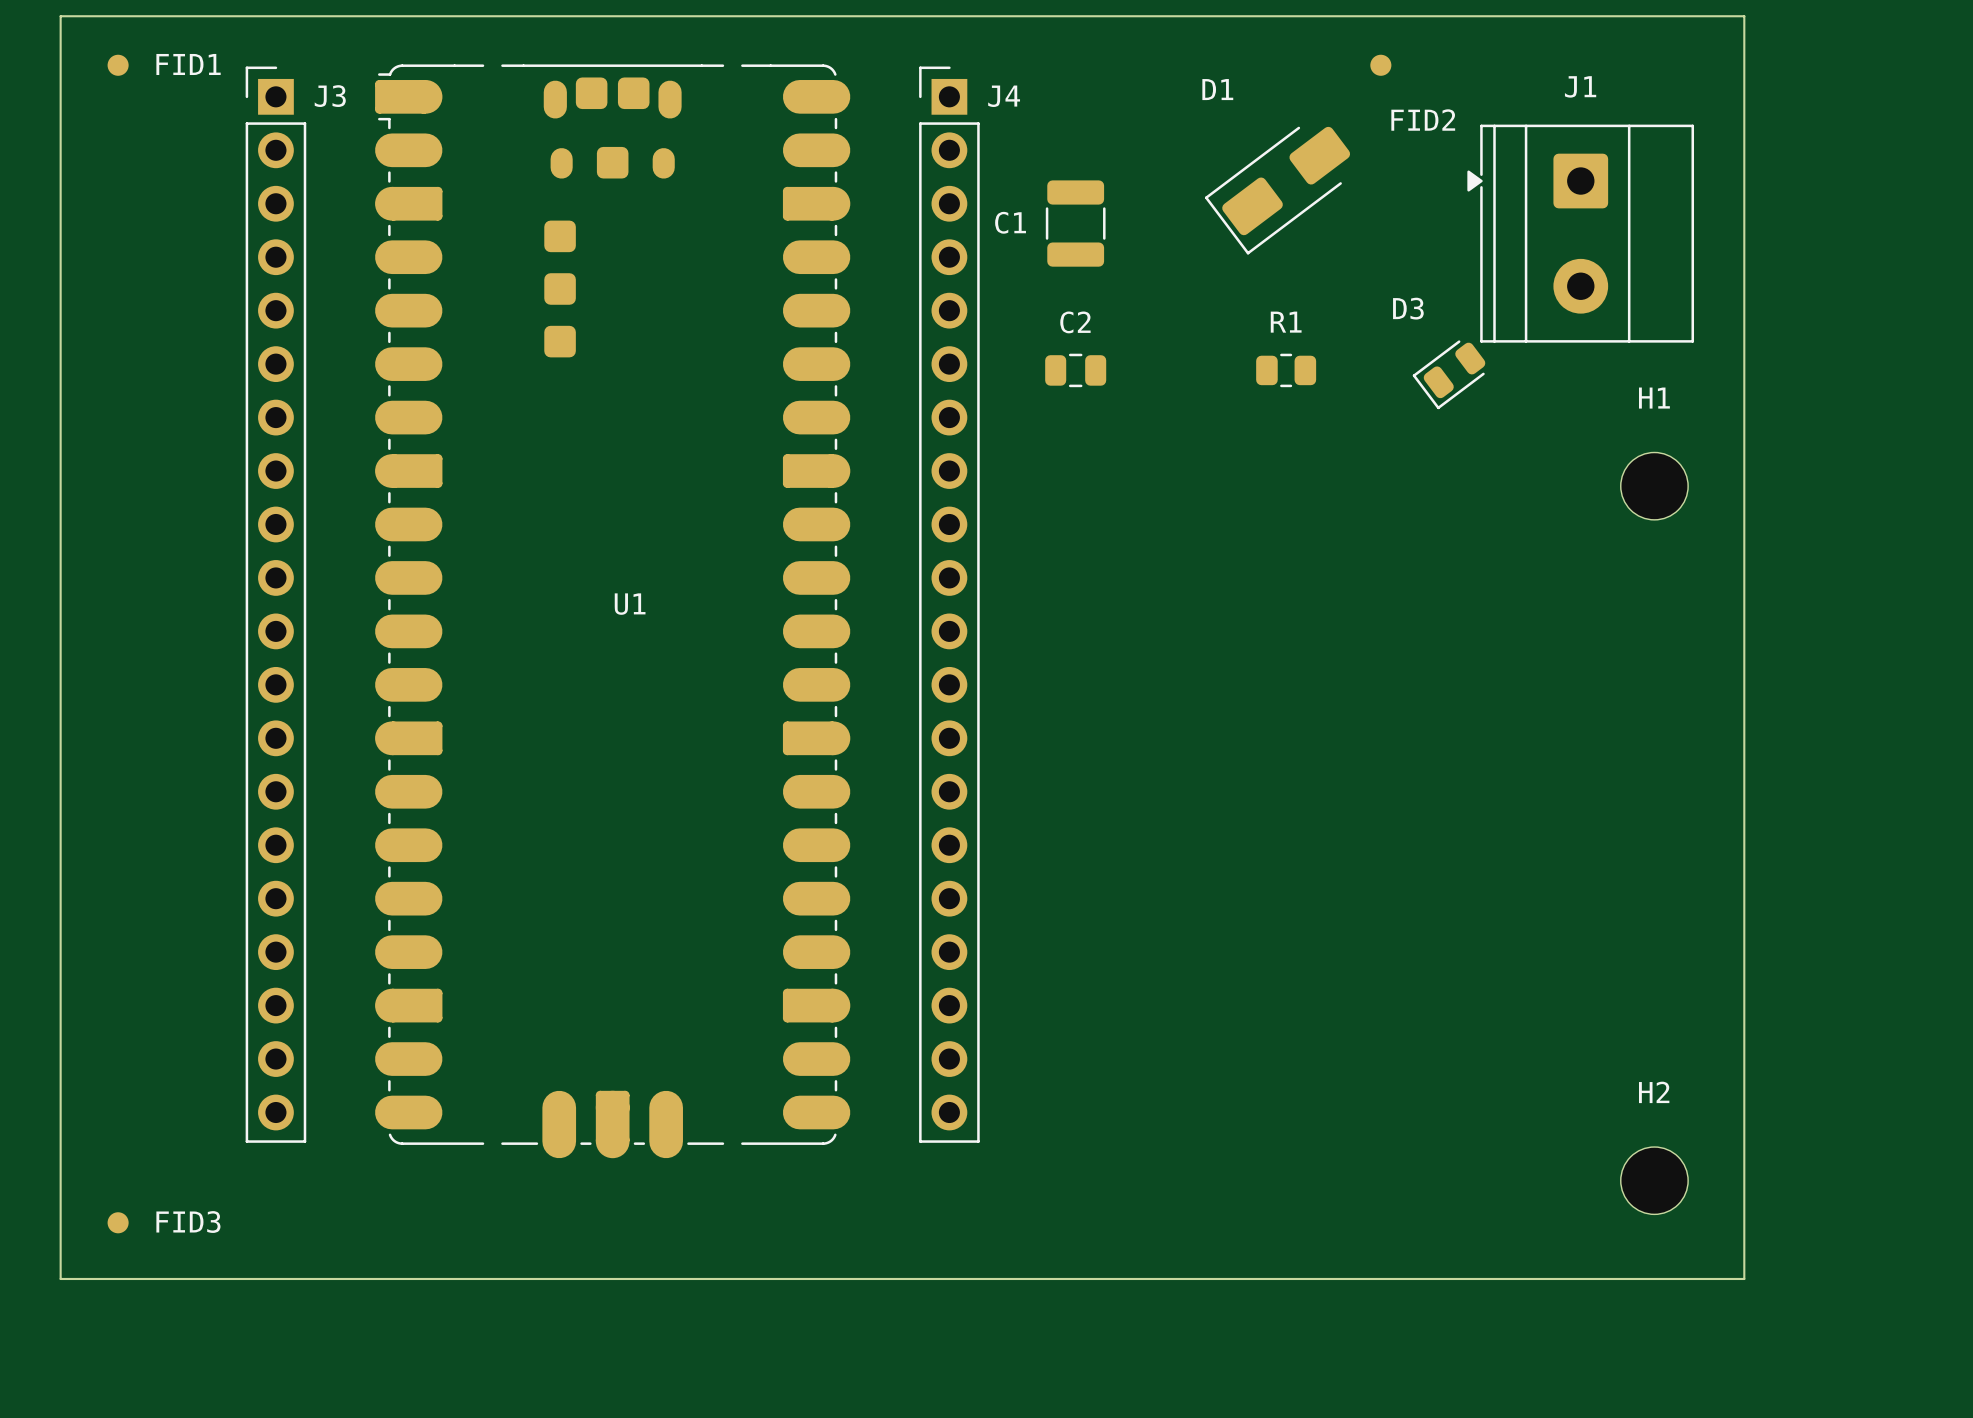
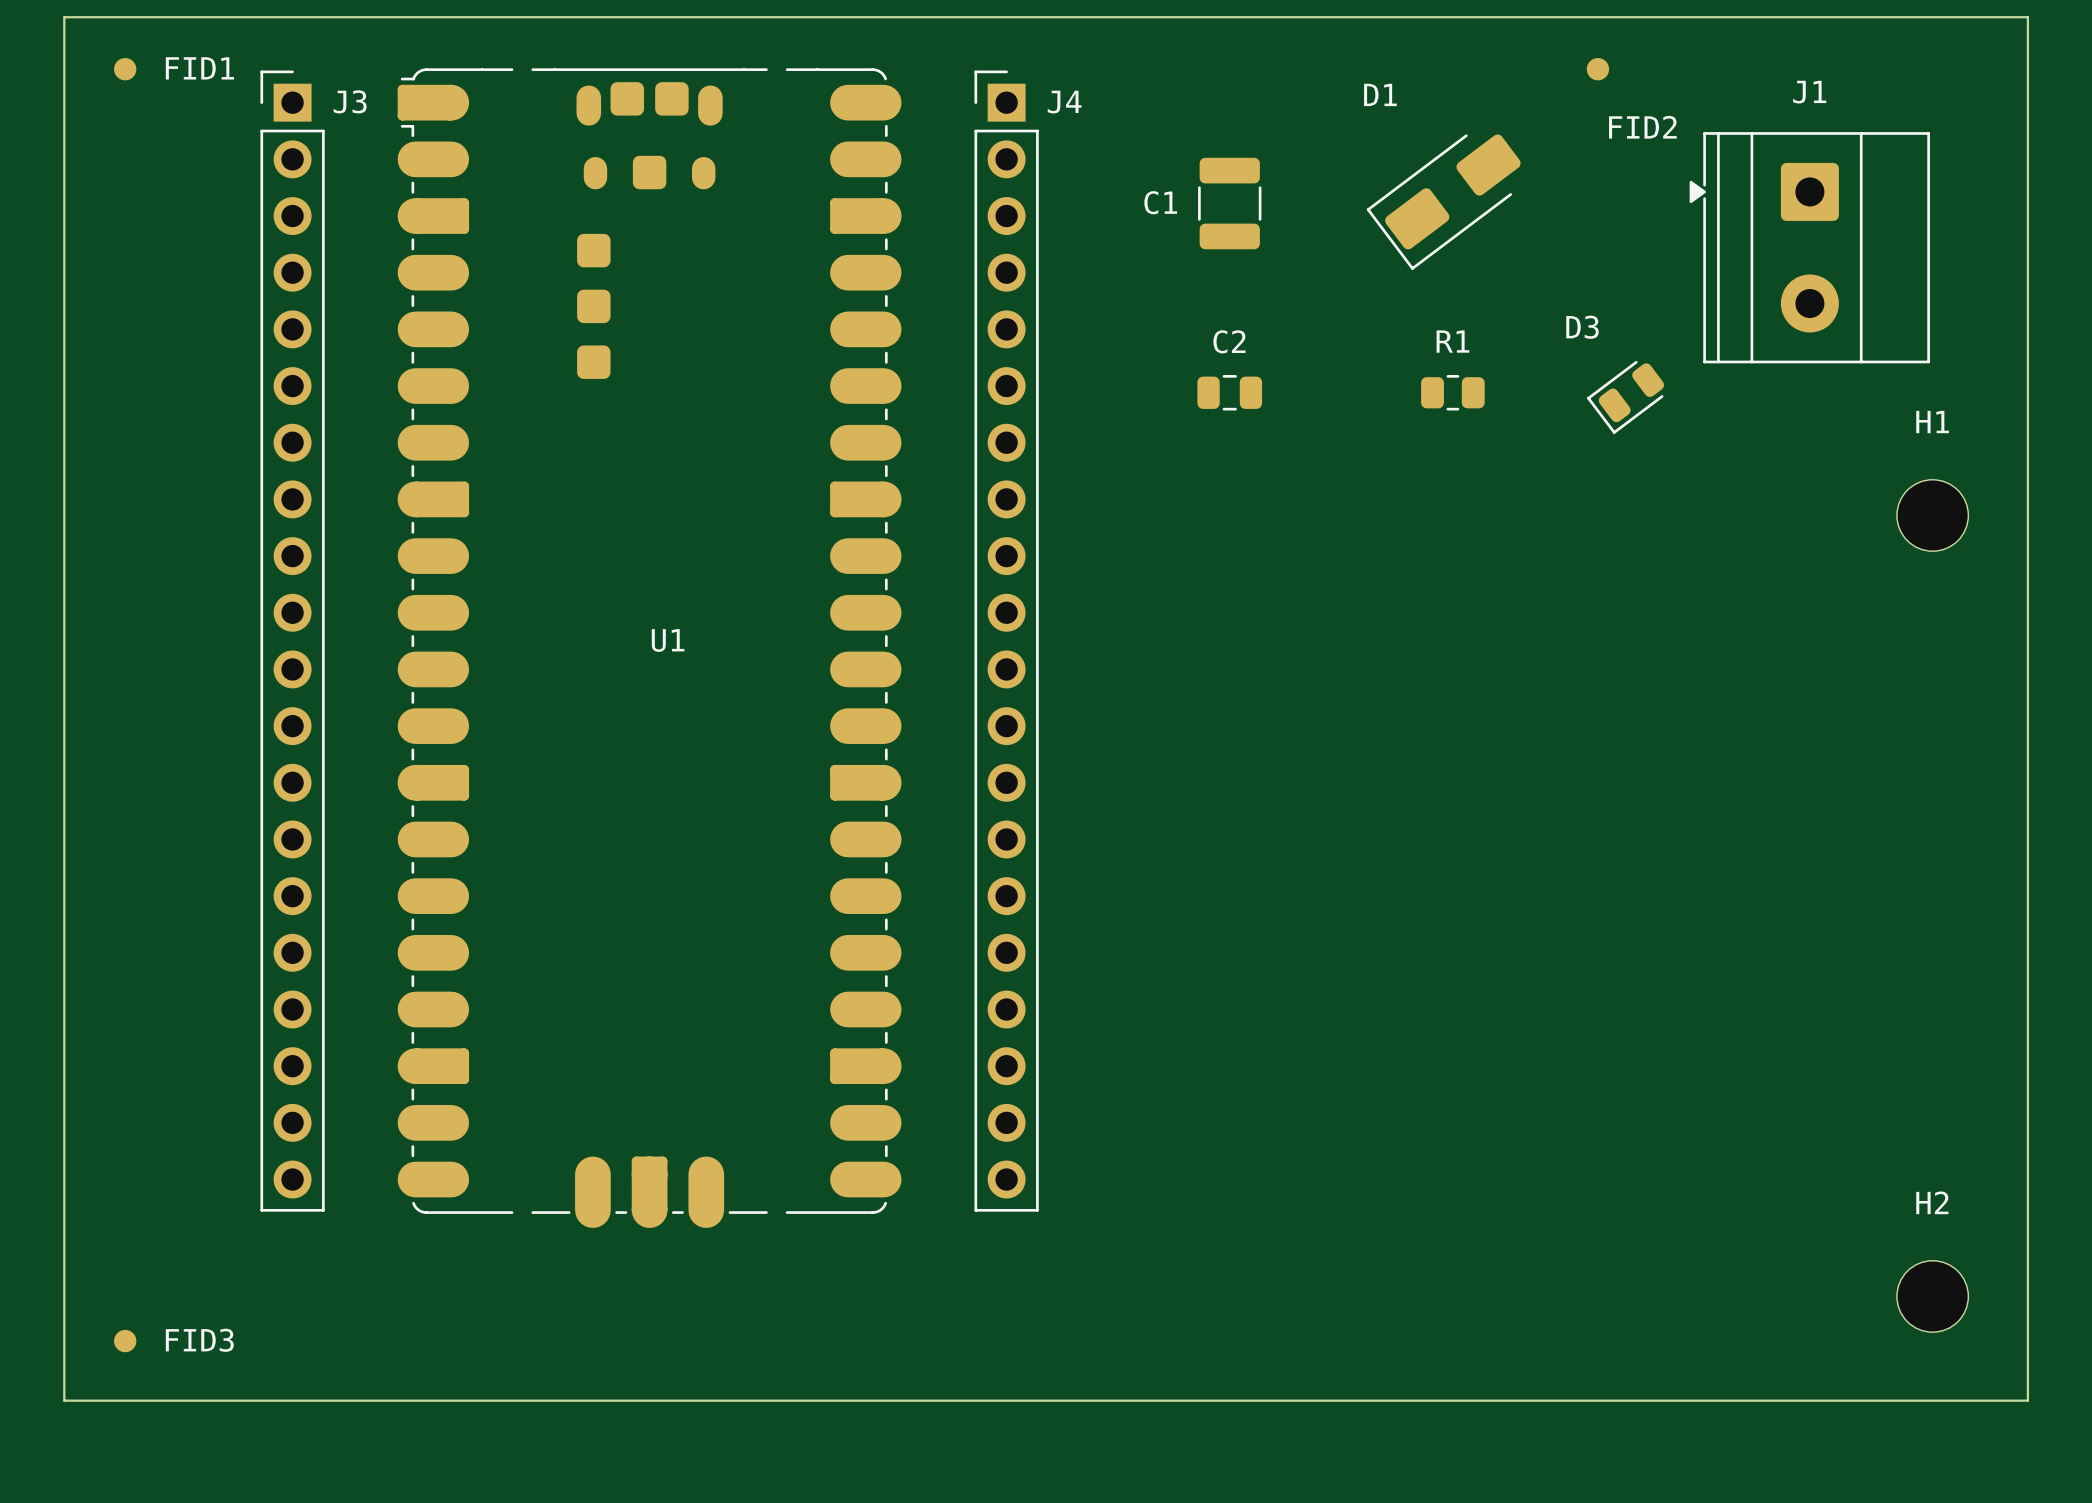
board edge: (1744, 16) (1744, 1278) (60, 1278) -> (1849, 17) (2027, 17) (2027, 1400) (64, 1400) (64, 1356)
FID2 position: (1380, 65) -> (1597, 69)
D1 position: (1277, 190) -> (1443, 202)
C1 position: (1075, 223) -> (1229, 203)
J1 position: (1580, 233) -> (1809, 247)
C2 position: (1075, 370) -> (1229, 392)
R1 position: (1286, 370) -> (1452, 392)
D3 position: (1449, 374) -> (1625, 397)
H1 position: (1654, 486) -> (1932, 515)
H2 position: (1654, 1180) -> (1932, 1296)
FID3 position: (118, 1222) -> (125, 1341)

